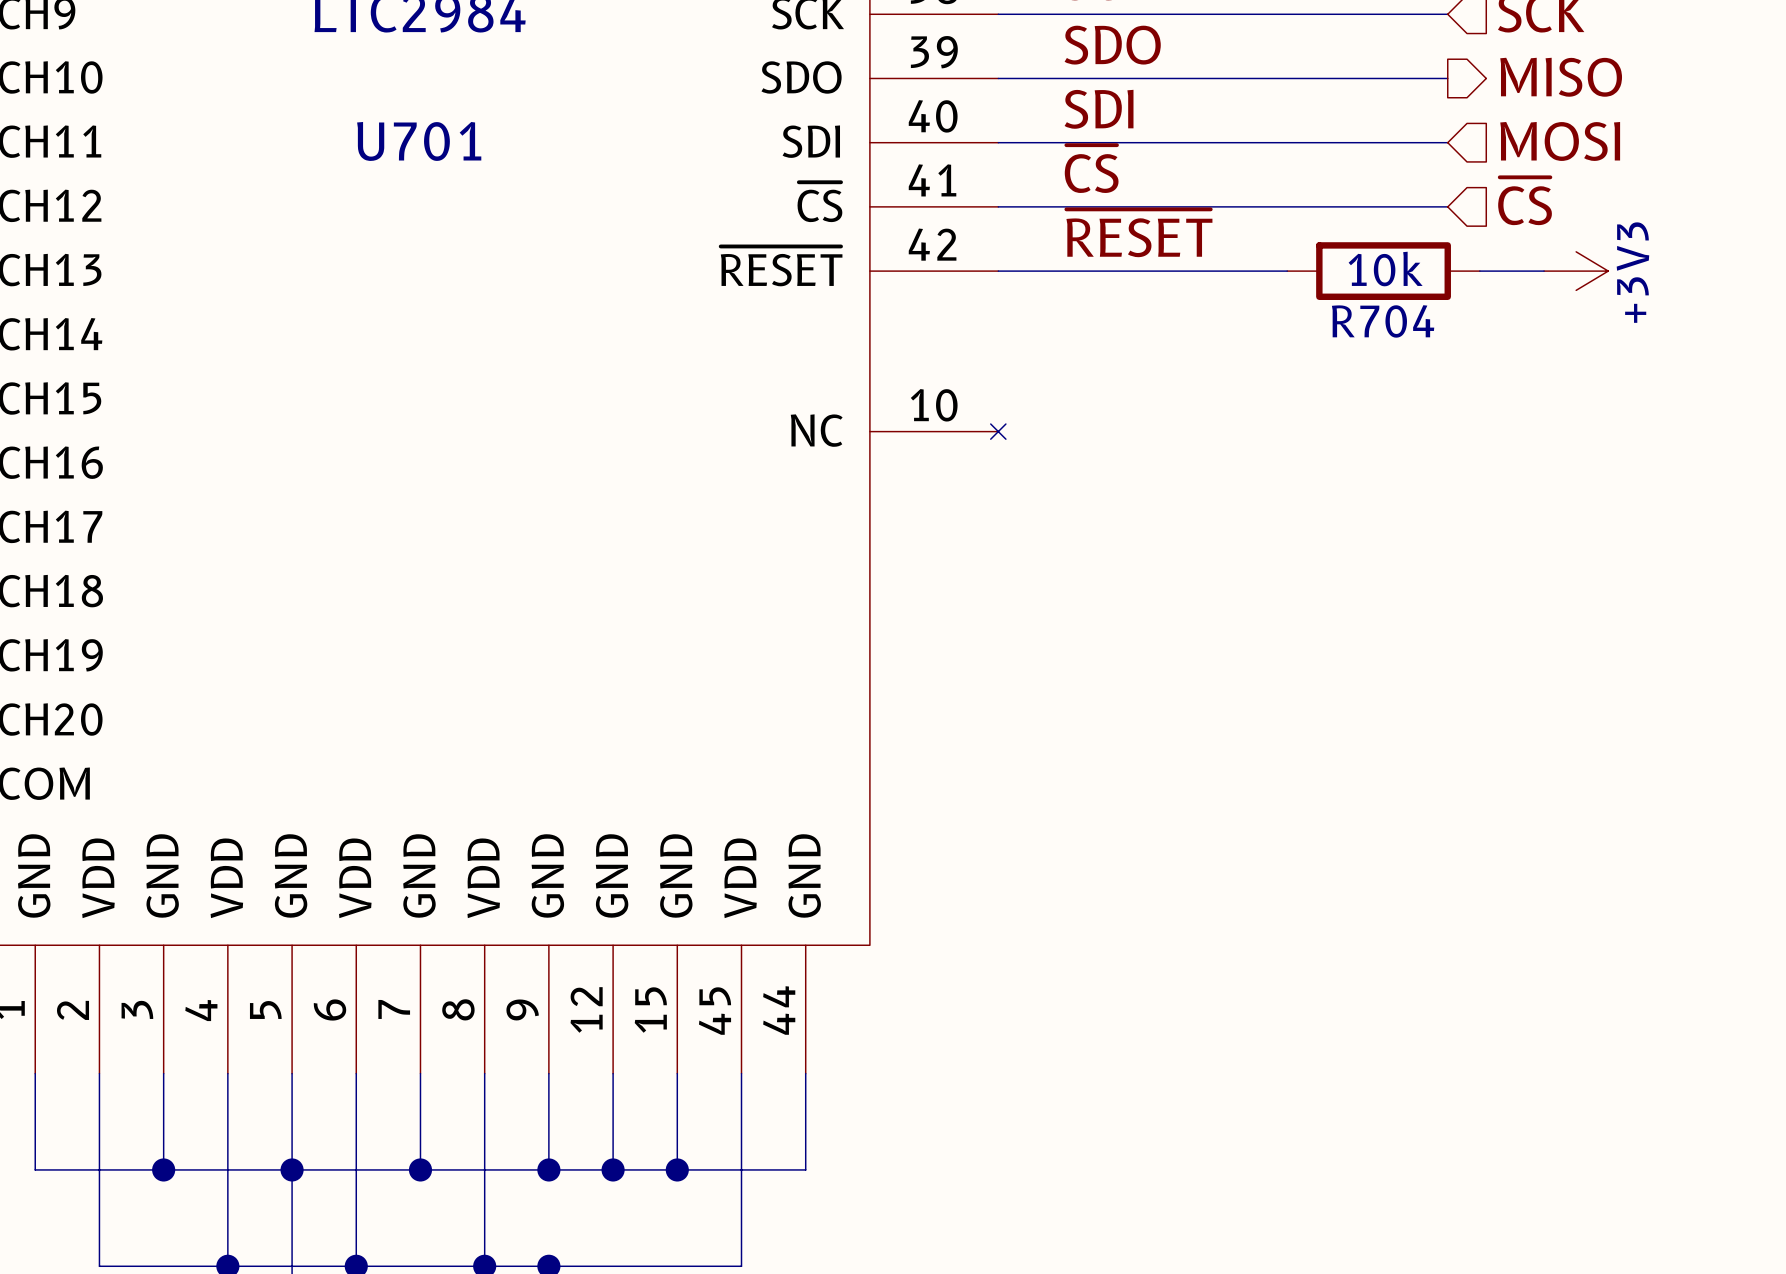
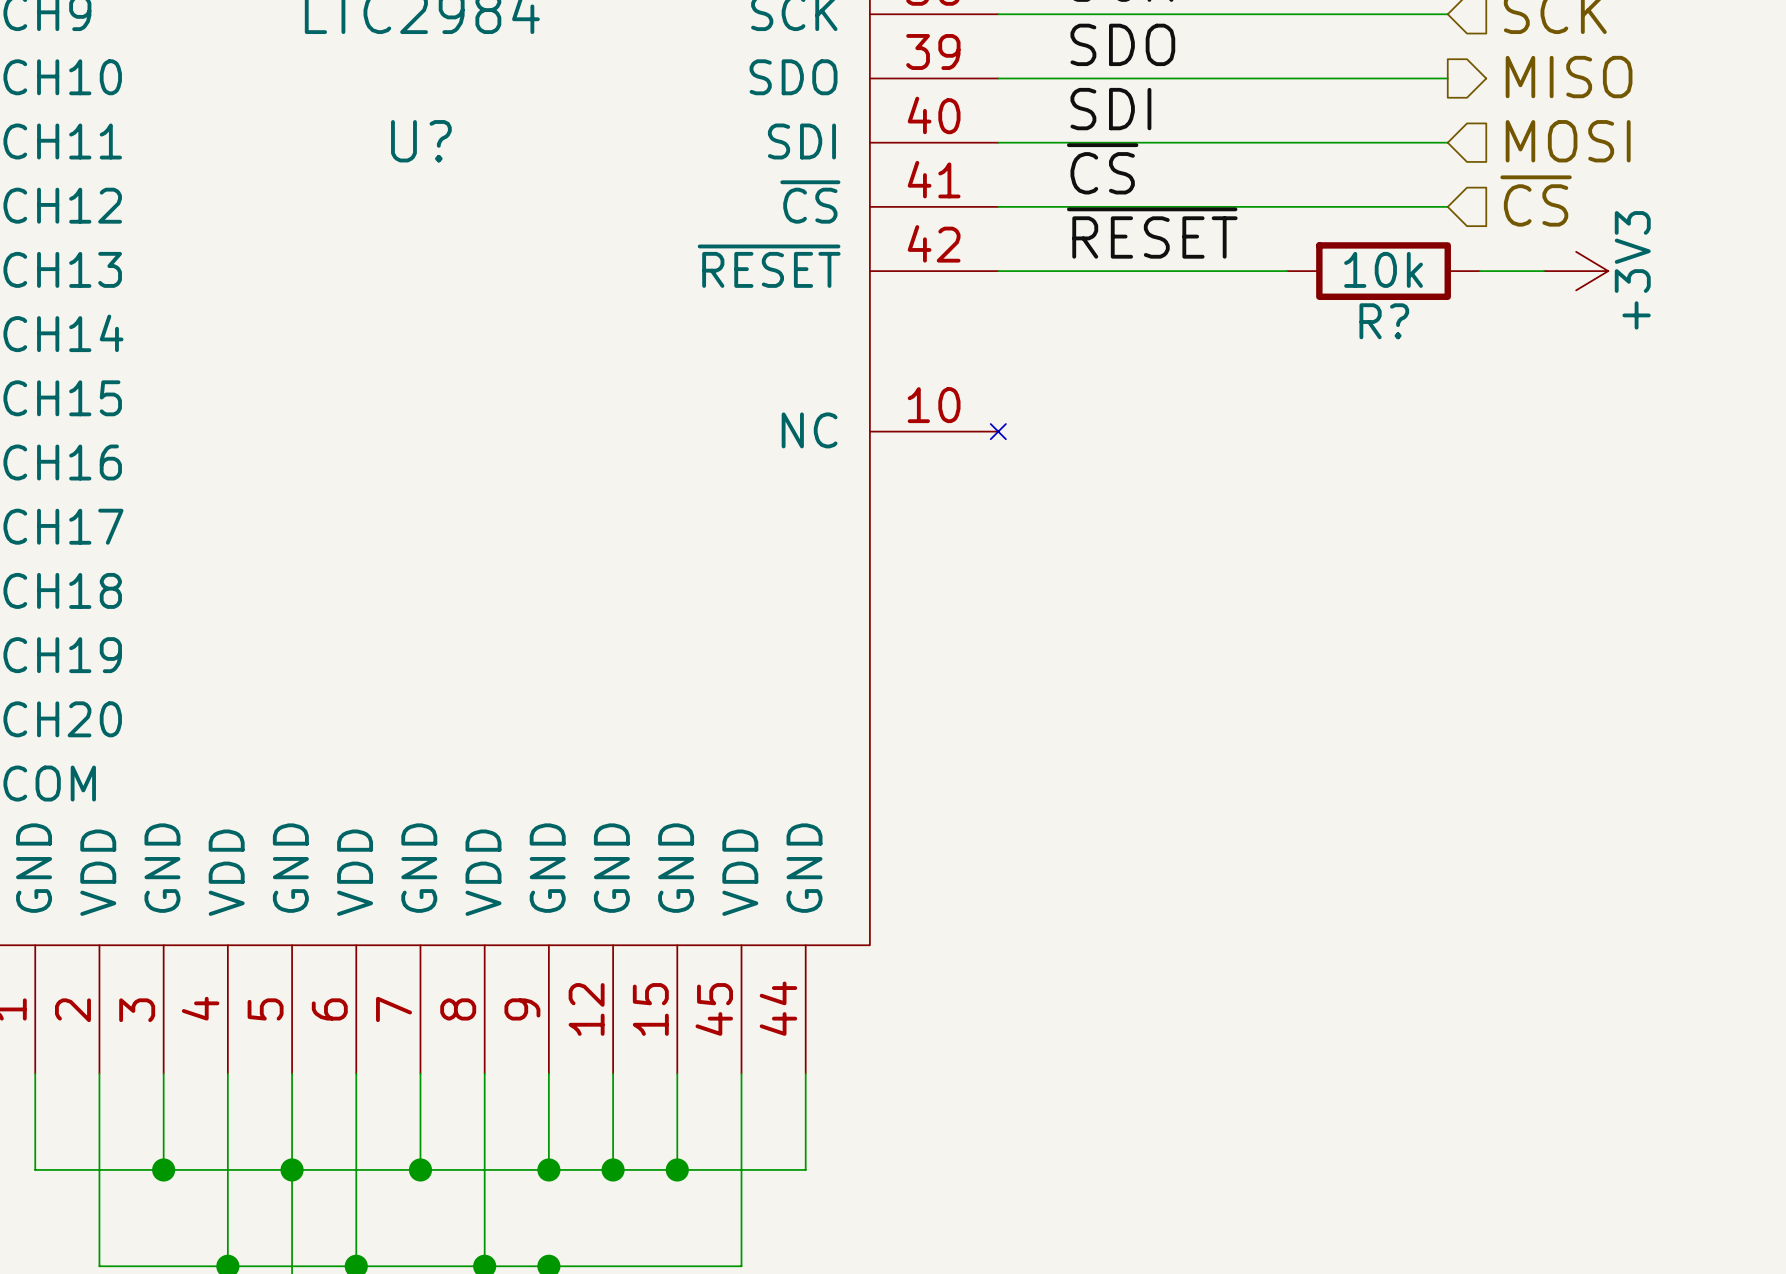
U701 name: U701 (419, 141) -> U? (421, 141)
R704 name: R704 (1383, 321) -> R? (1384, 321)

